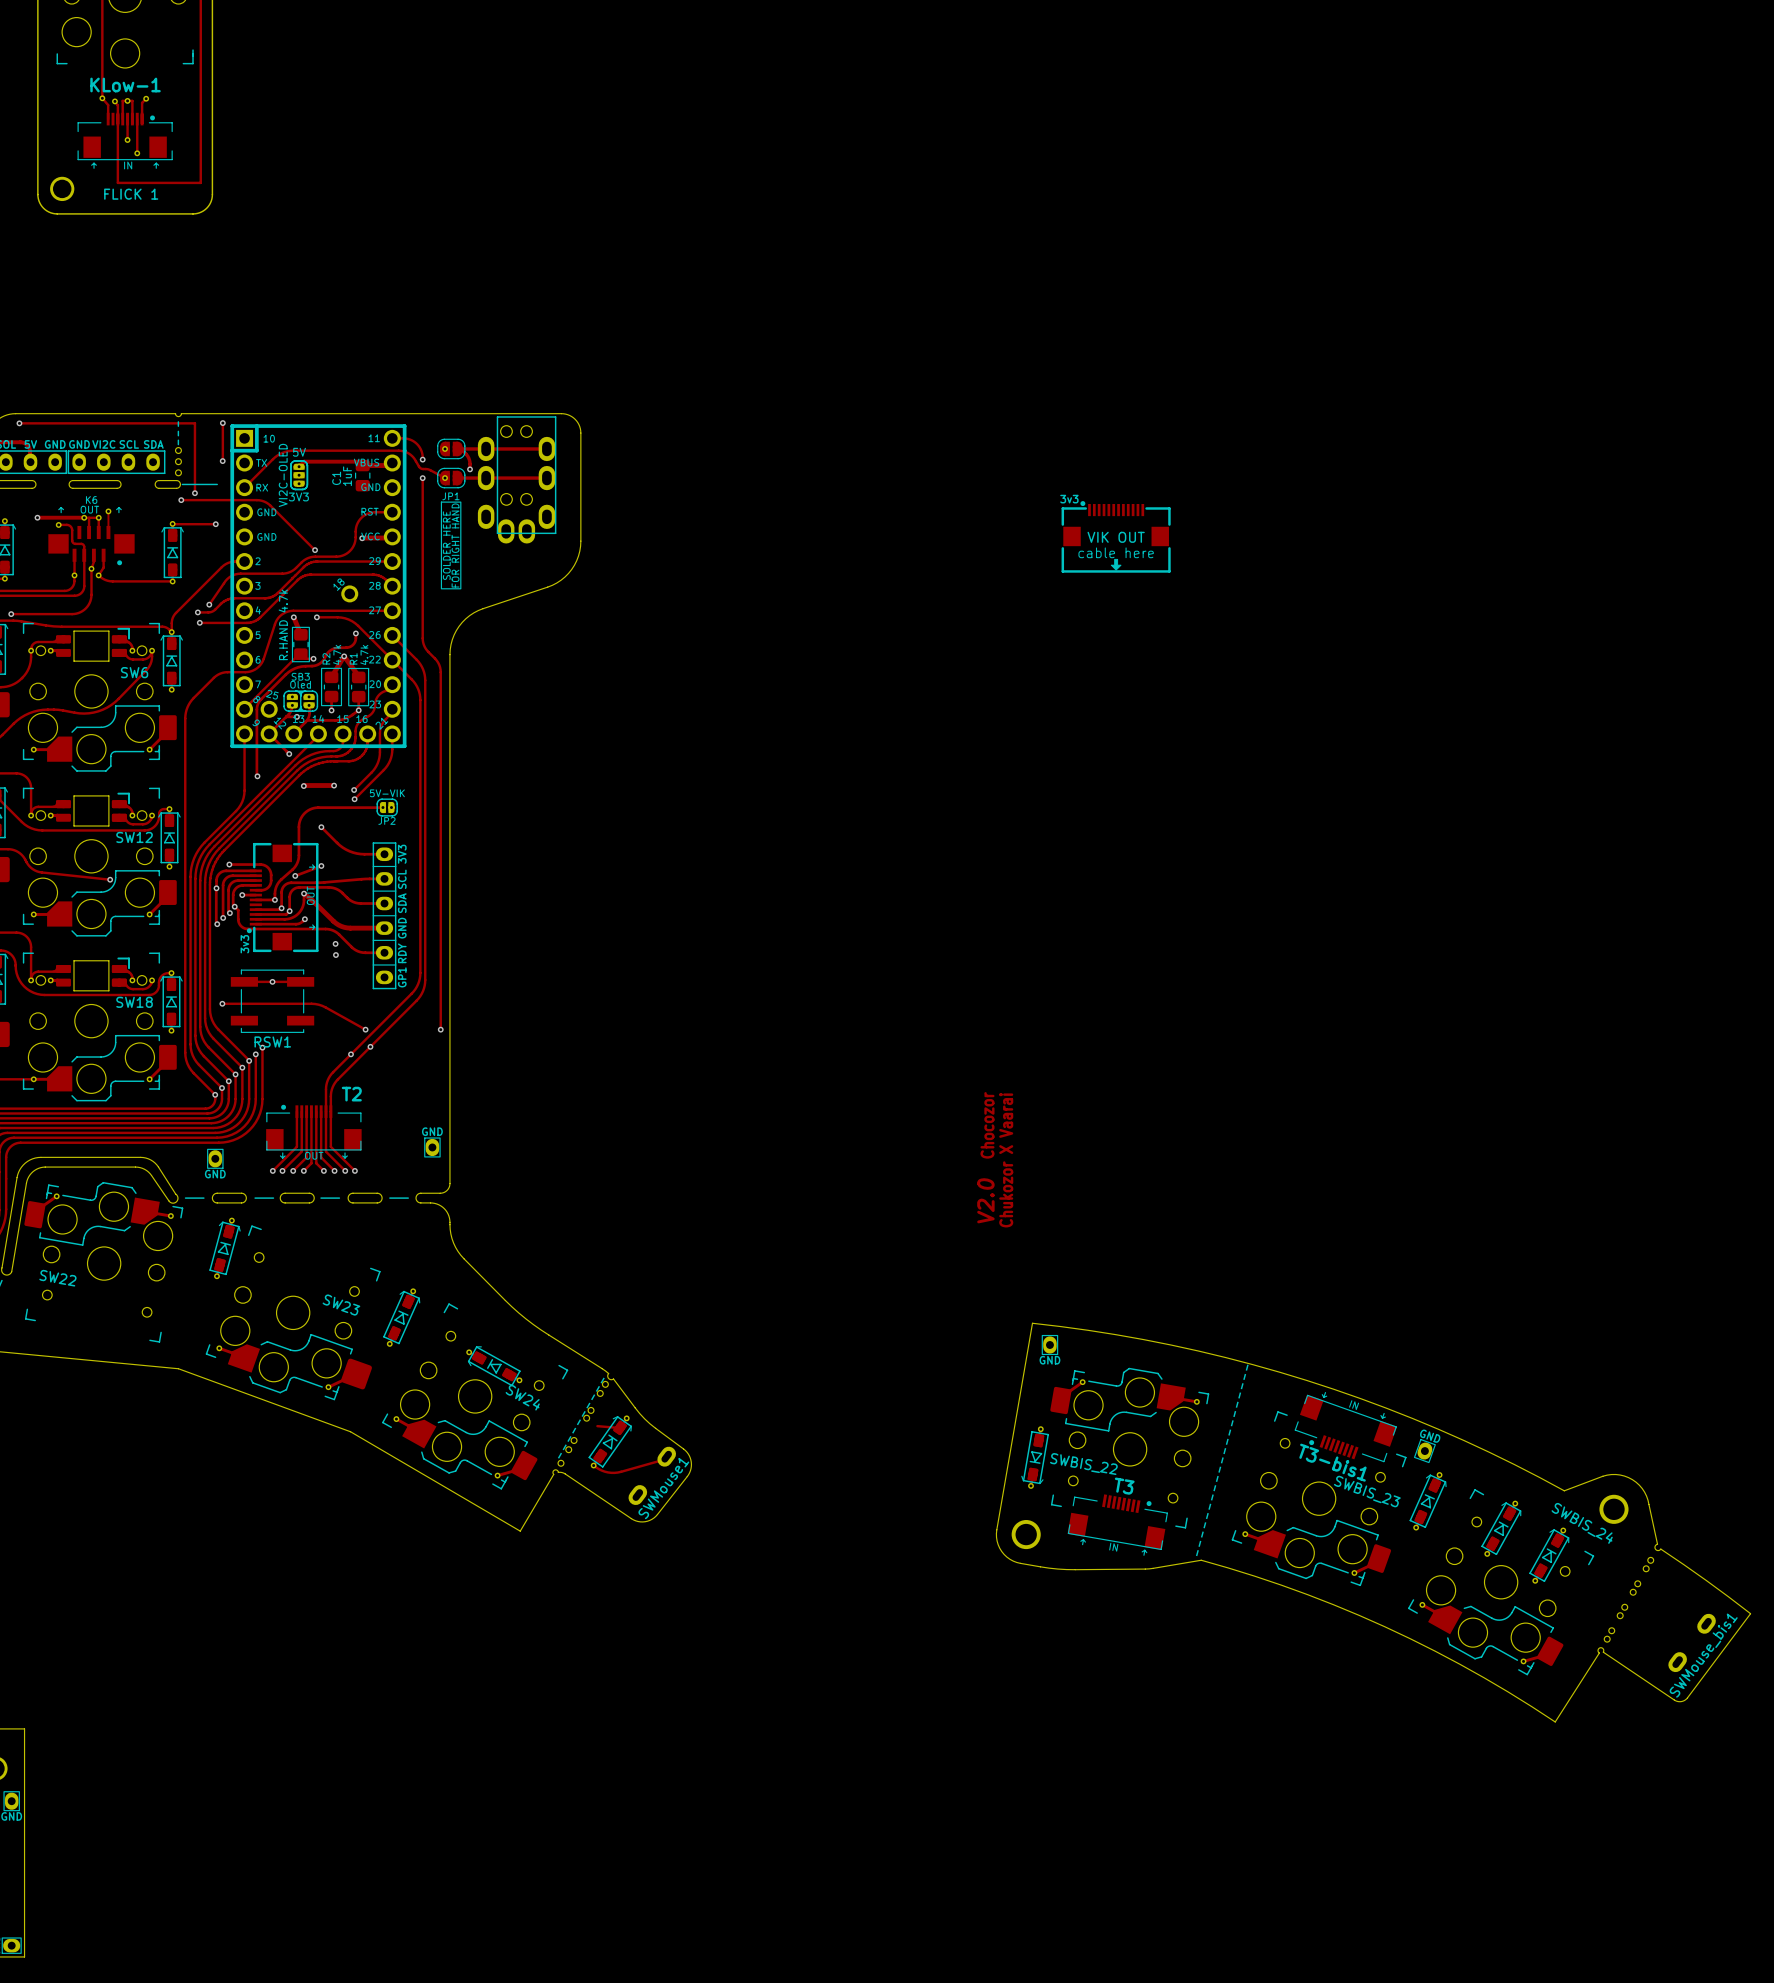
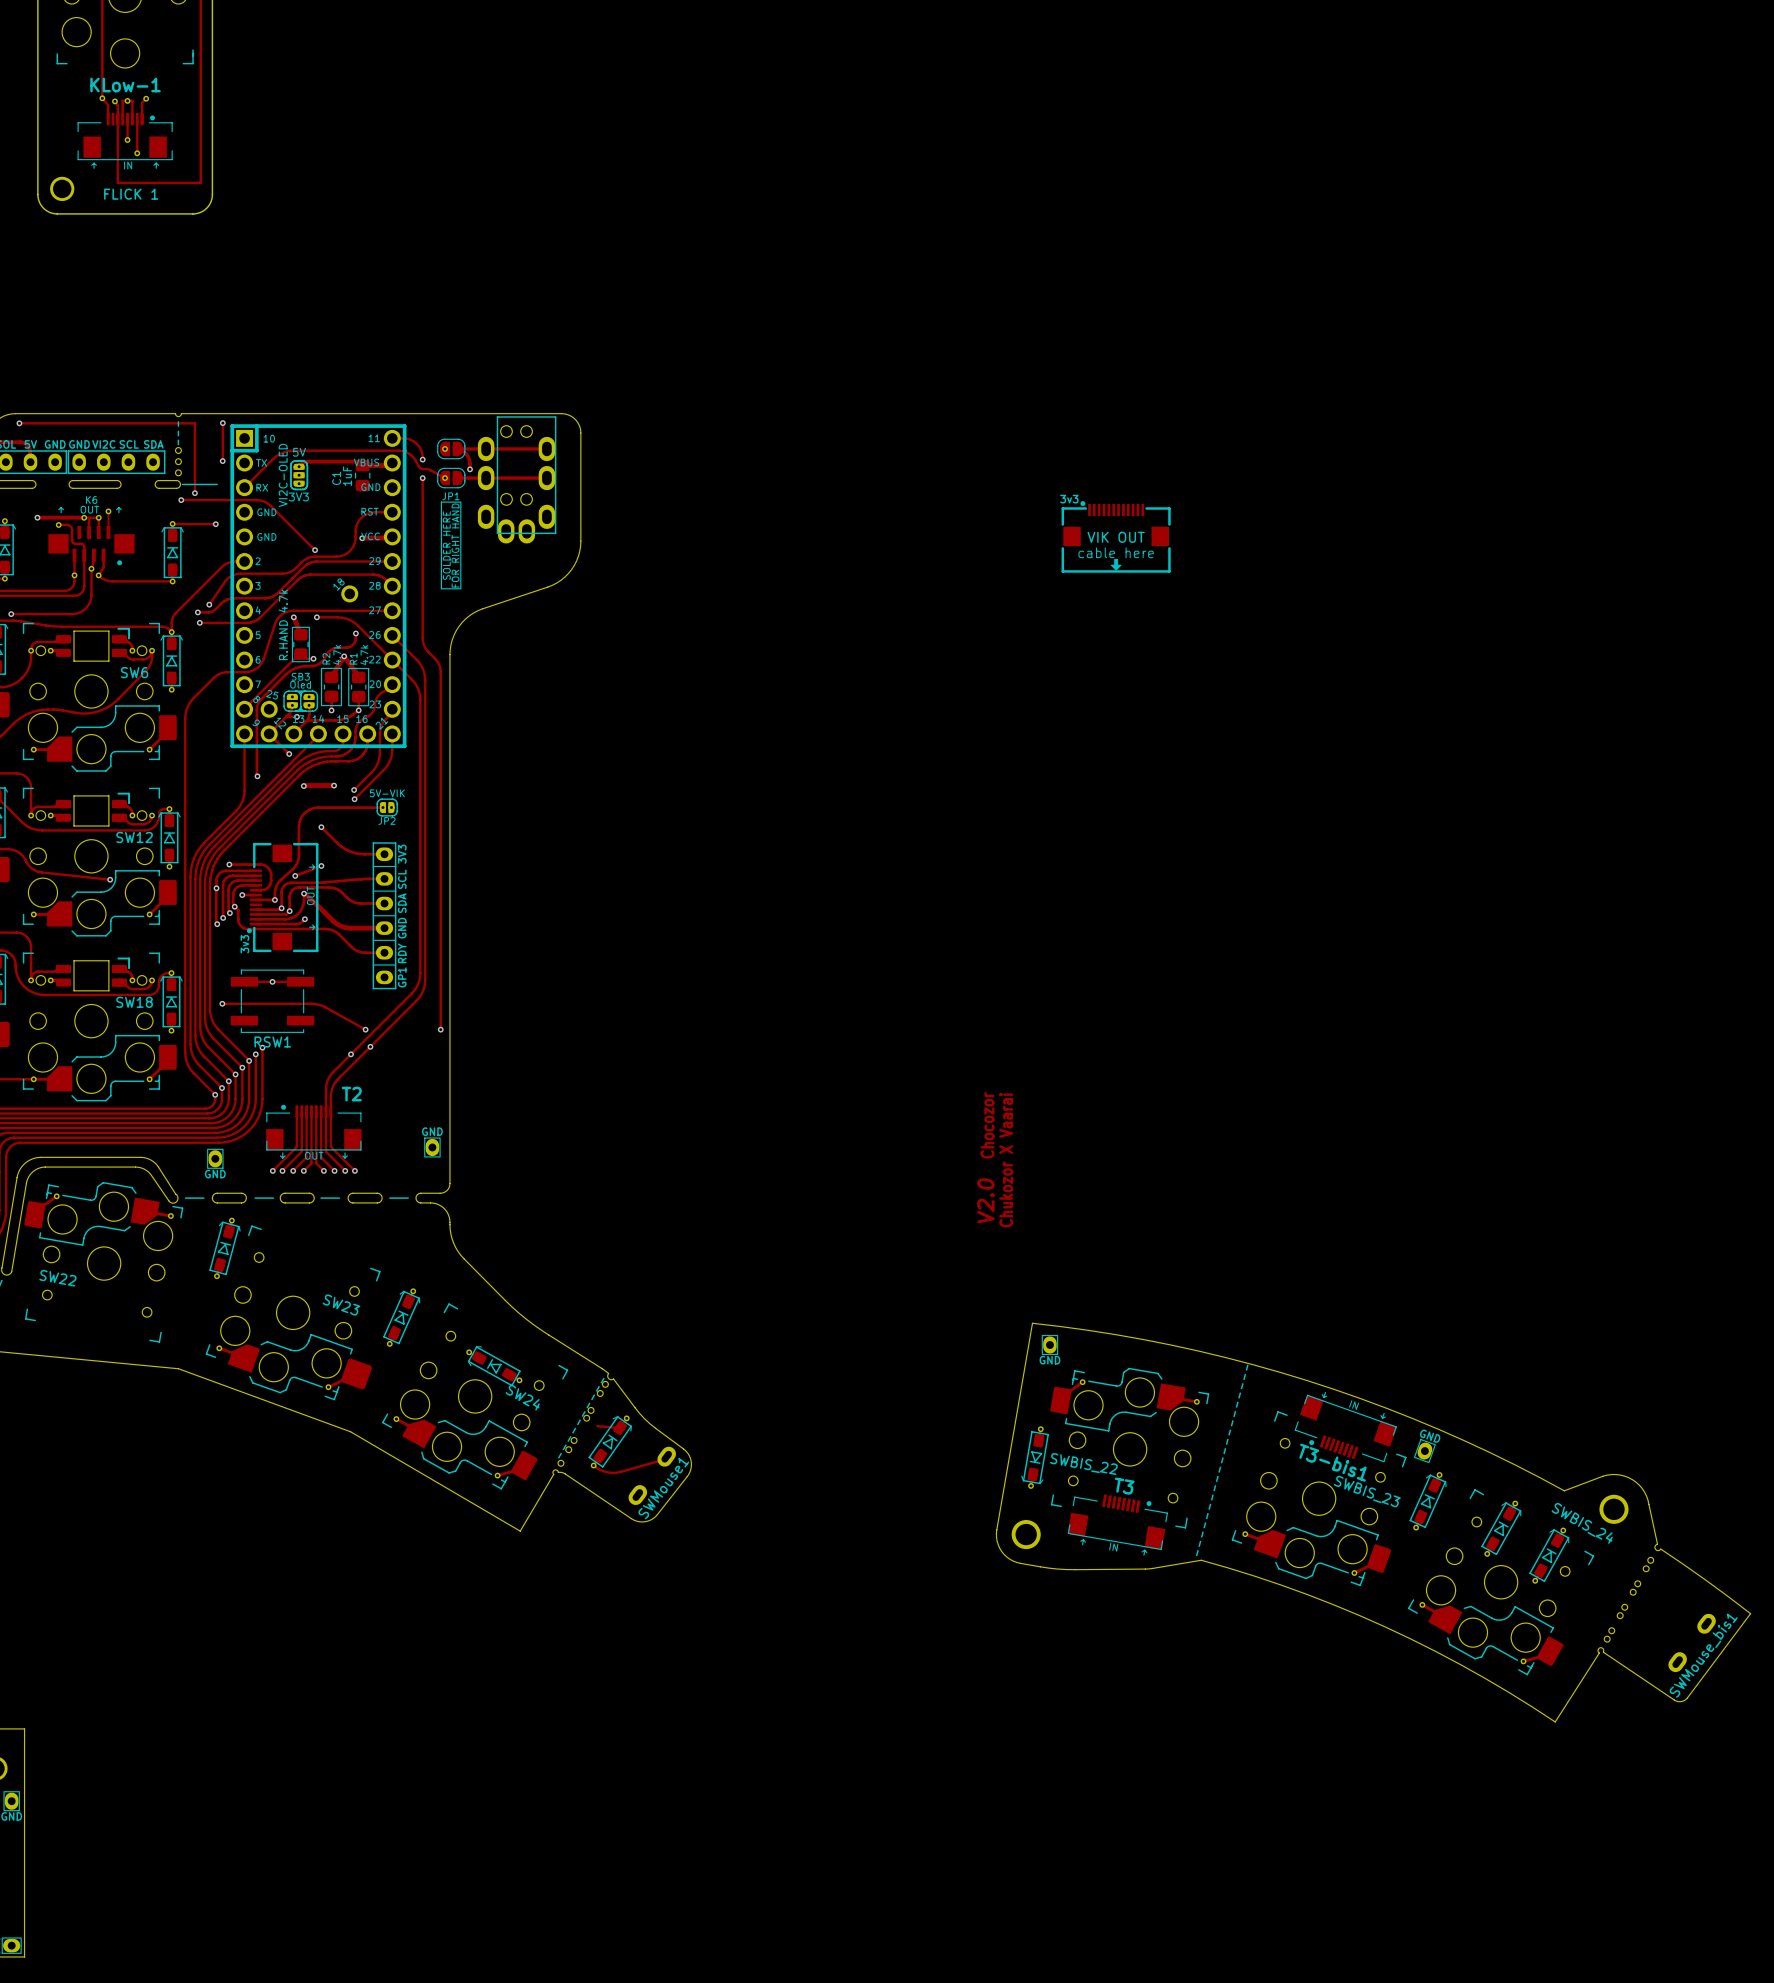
via: (335, 943) -> none
via: (335, 955) -> none

